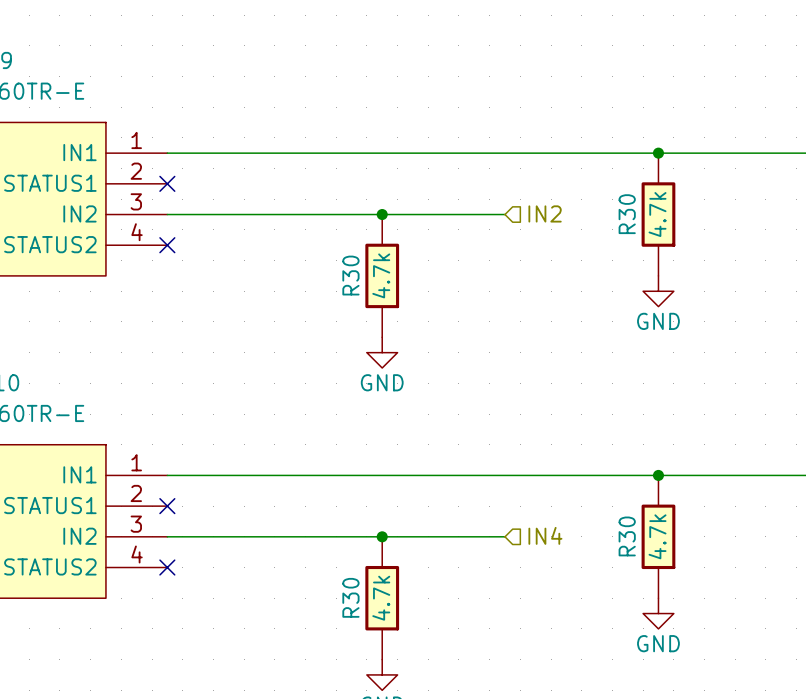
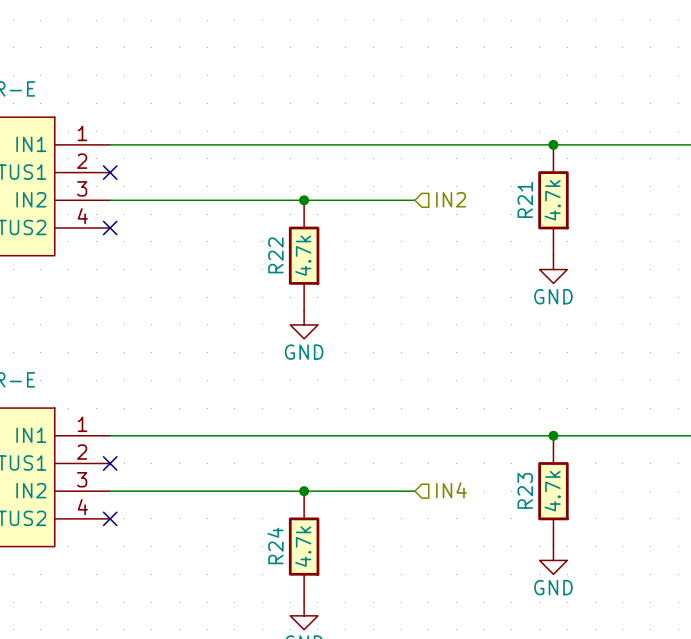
R30 name: R30 (627, 214) -> R21 (525, 199)
R30 name: R30 (350, 275) -> R22 (275, 255)
R30 name: R30 (627, 536) -> R23 (525, 490)
R30 name: R30 (350, 597) -> R24 (275, 545)

